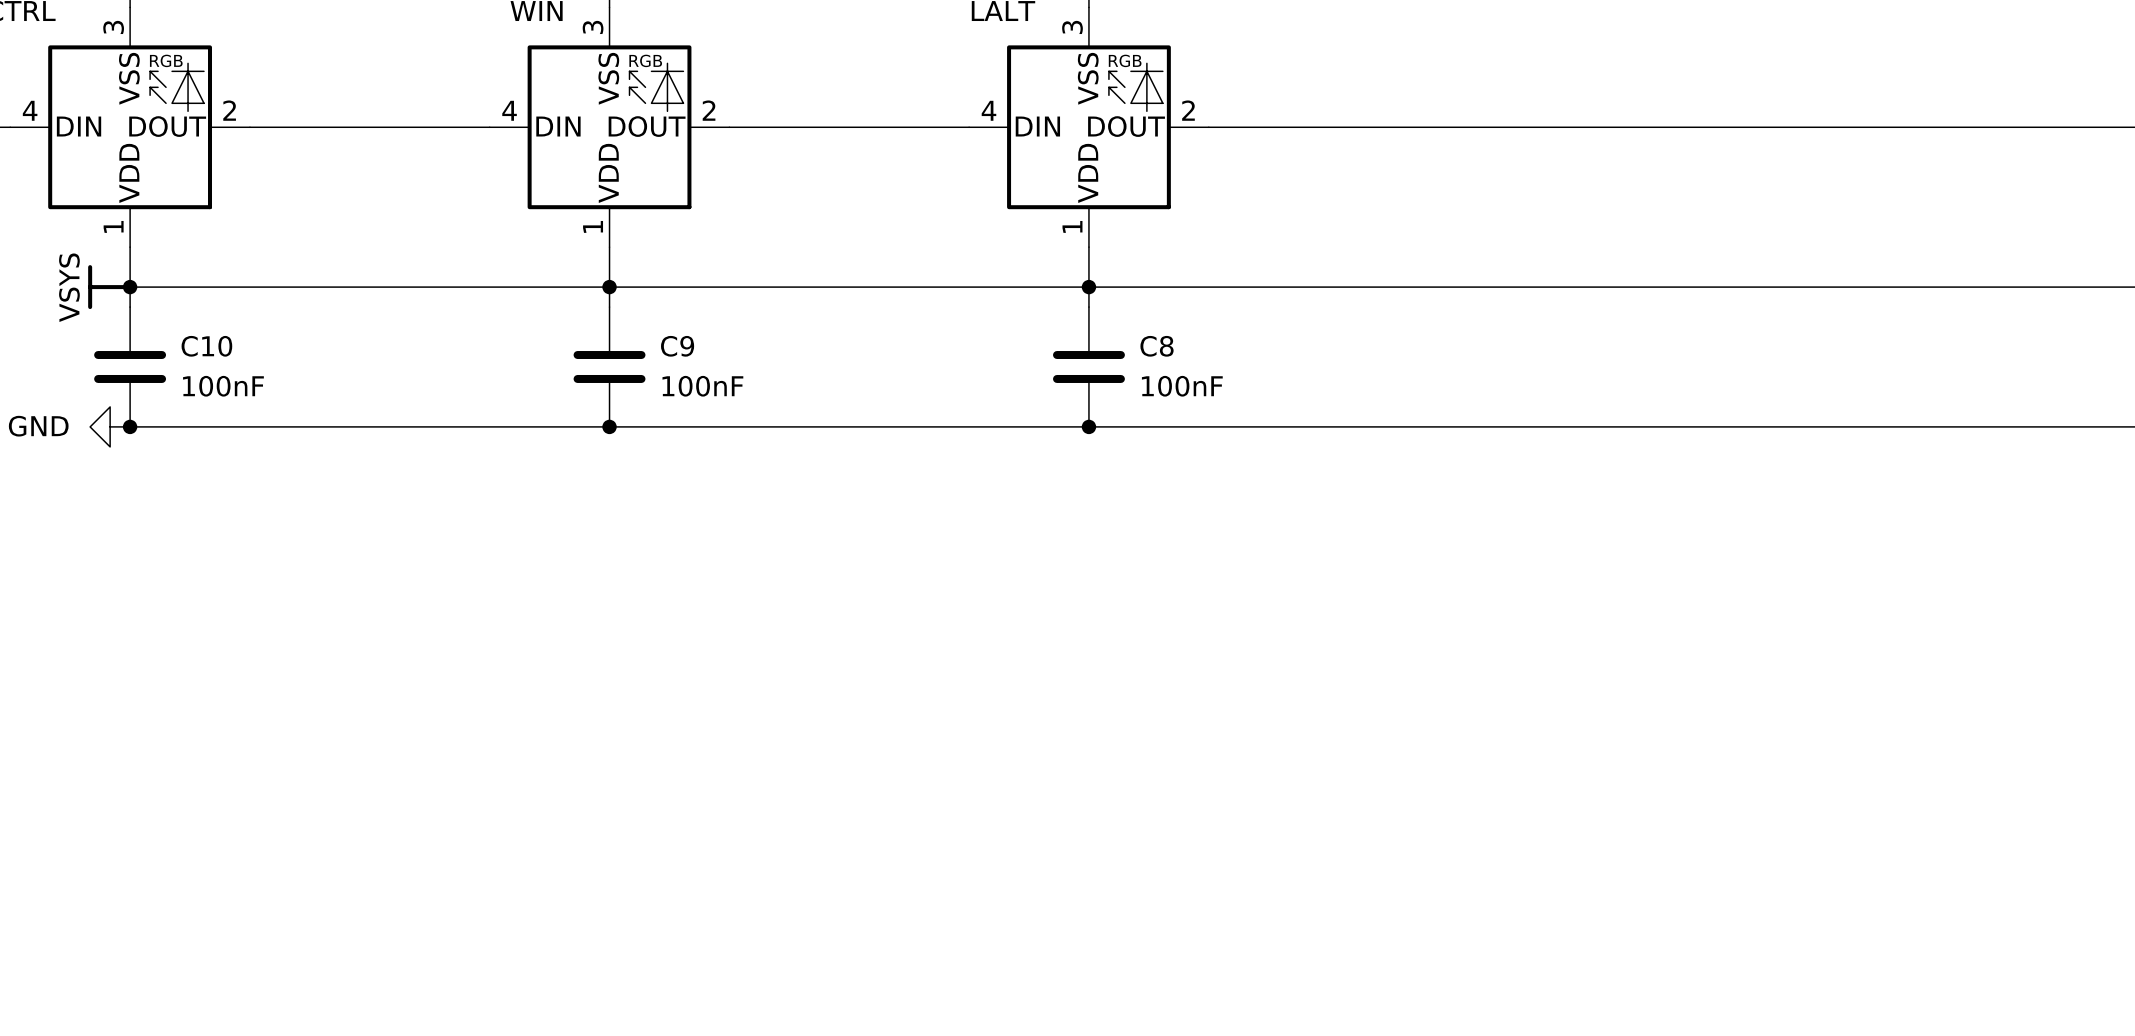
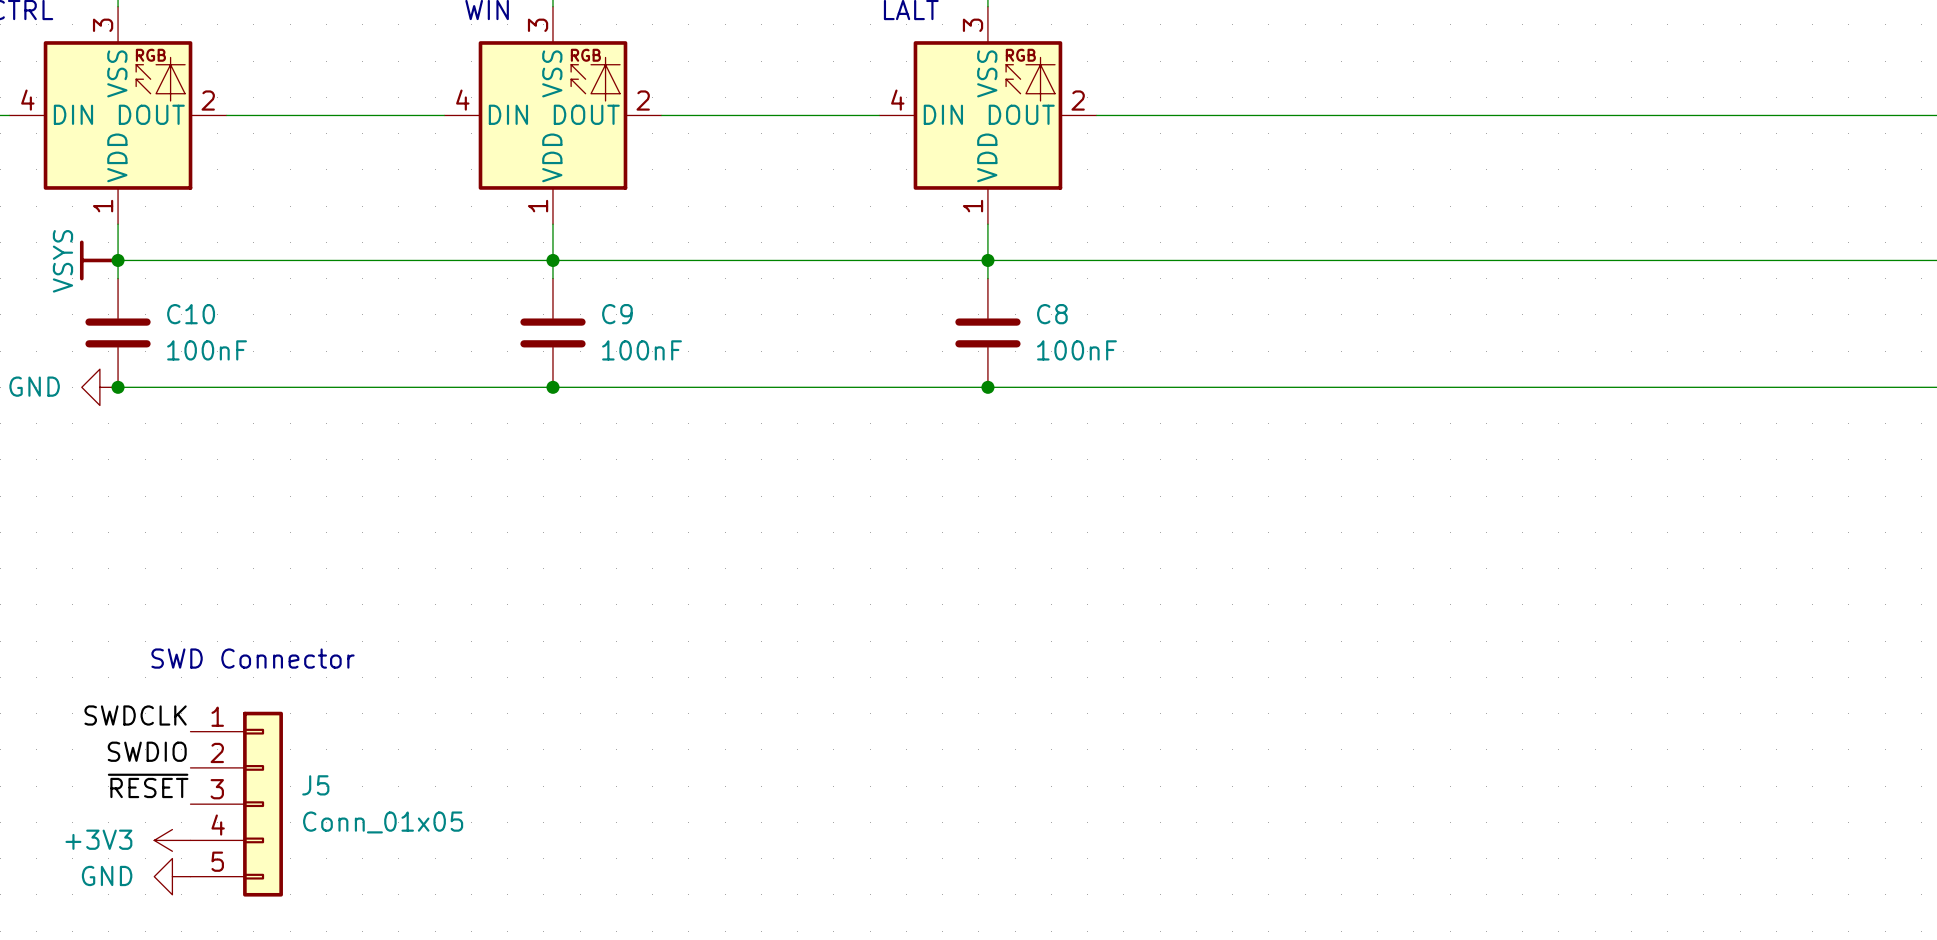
text: none -> SWD Connector (253, 658)
label: none -> SWDCLK (135, 715)
label: none -> SWDIO (147, 751)
label: none -> ~{RESET} (148, 785)
J5: none -> Conn_01x05 (236, 804)
power symbol: none -> +3V3 (172, 840)
power symbol: none -> GND (172, 876)

